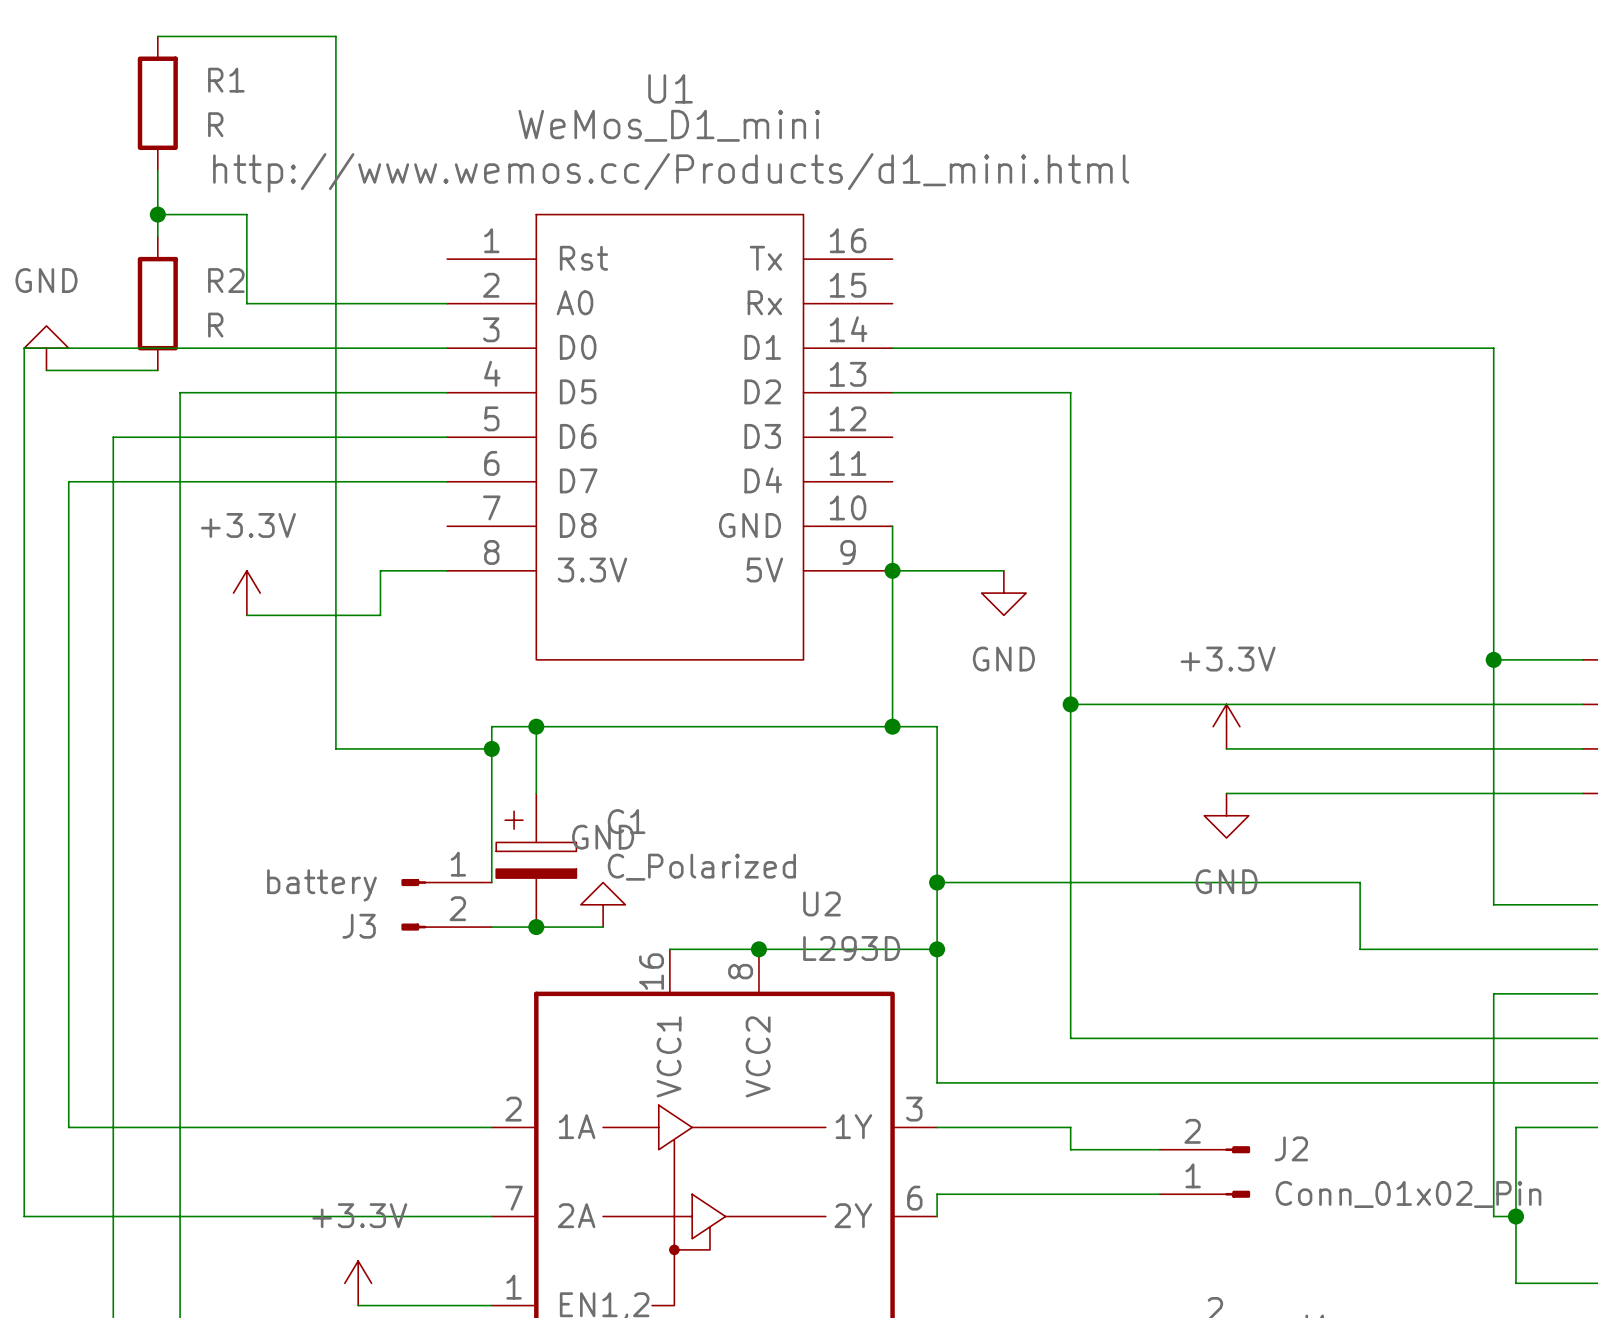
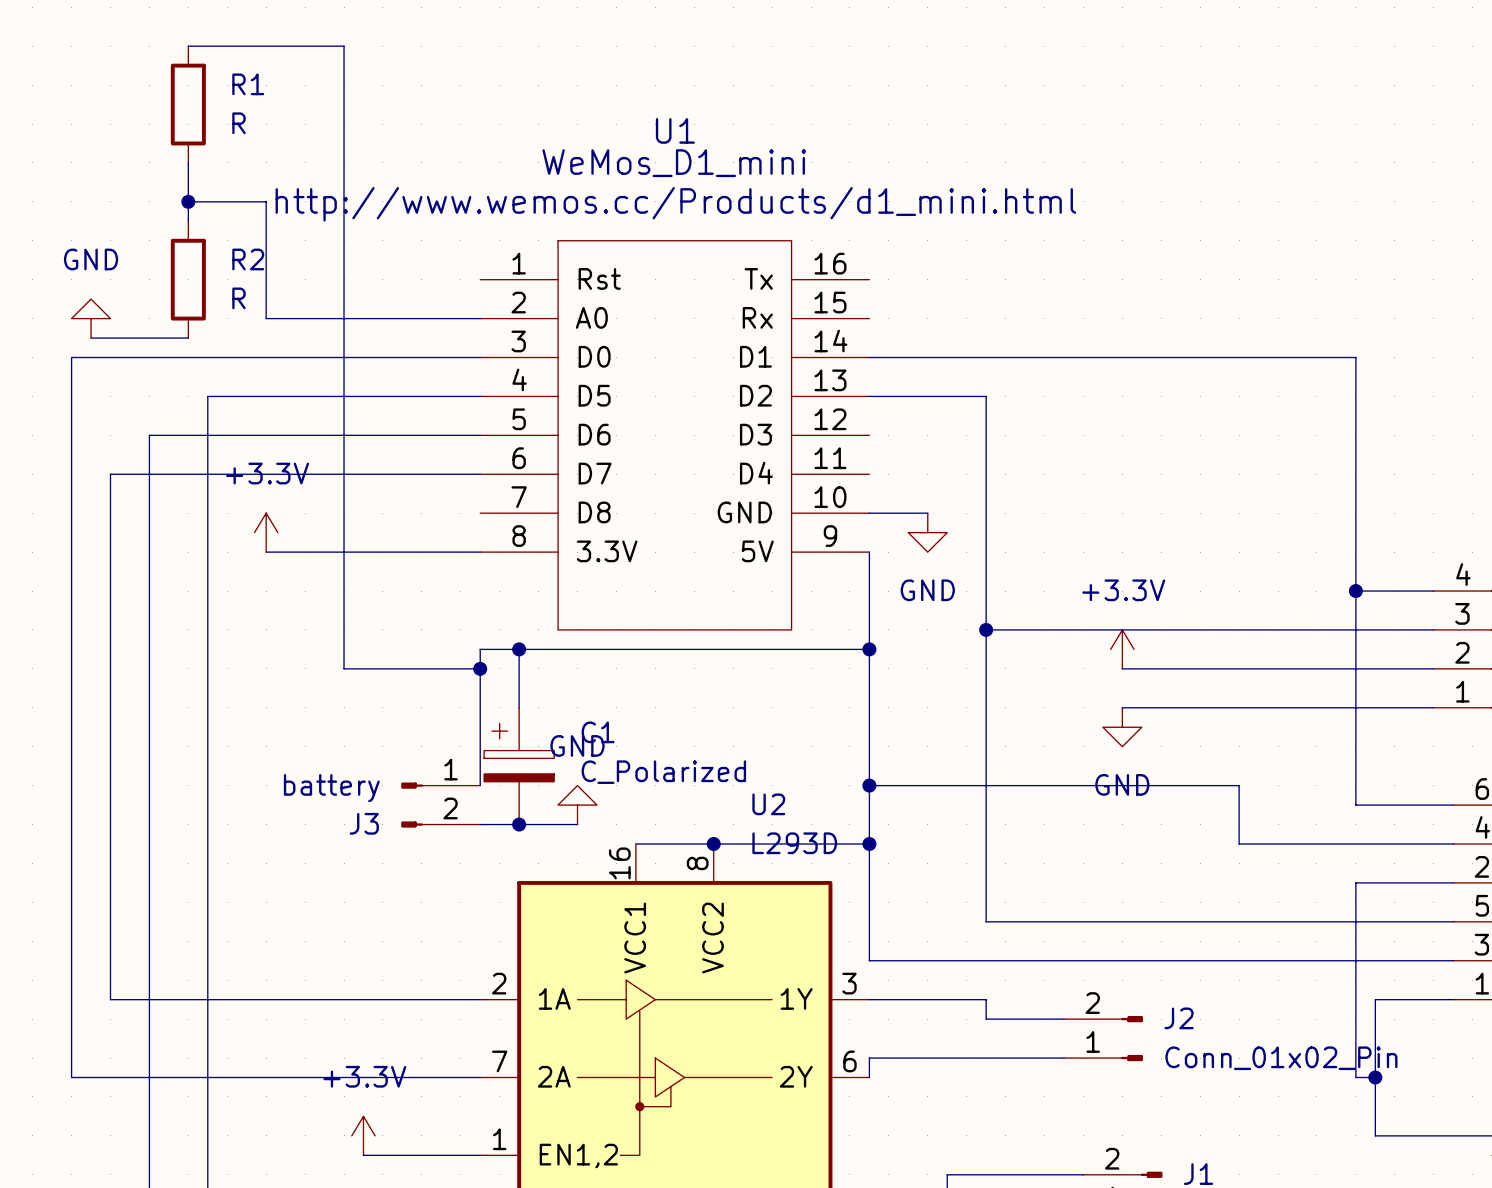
wire: (246, 303) (447, 303) -> (266, 279) (266, 318)
wire: (246, 348) (24, 348) (24, 392) -> (207, 357) (71, 357)
wire: (892, 348) (1493, 348) (1493, 392) -> (986, 357) (1355, 357)
wire: (180, 392) (180, 437) (113, 437) (113, 481) (68, 481) (68, 526) -> (480, 474) (110, 474)
wire: (1070, 392) (1070, 437) -> (869, 396) (986, 396)
U1 position: (669, 437) -> (674, 435)
wire: (892, 526) (892, 726) -> none
wire: (447, 570) (380, 570) (380, 615) -> (480, 552) (382, 552)
junction: (892, 570) -> none
wire: none -> (869, 552) (869, 649)
junction position: (892, 726) -> (869, 649)

